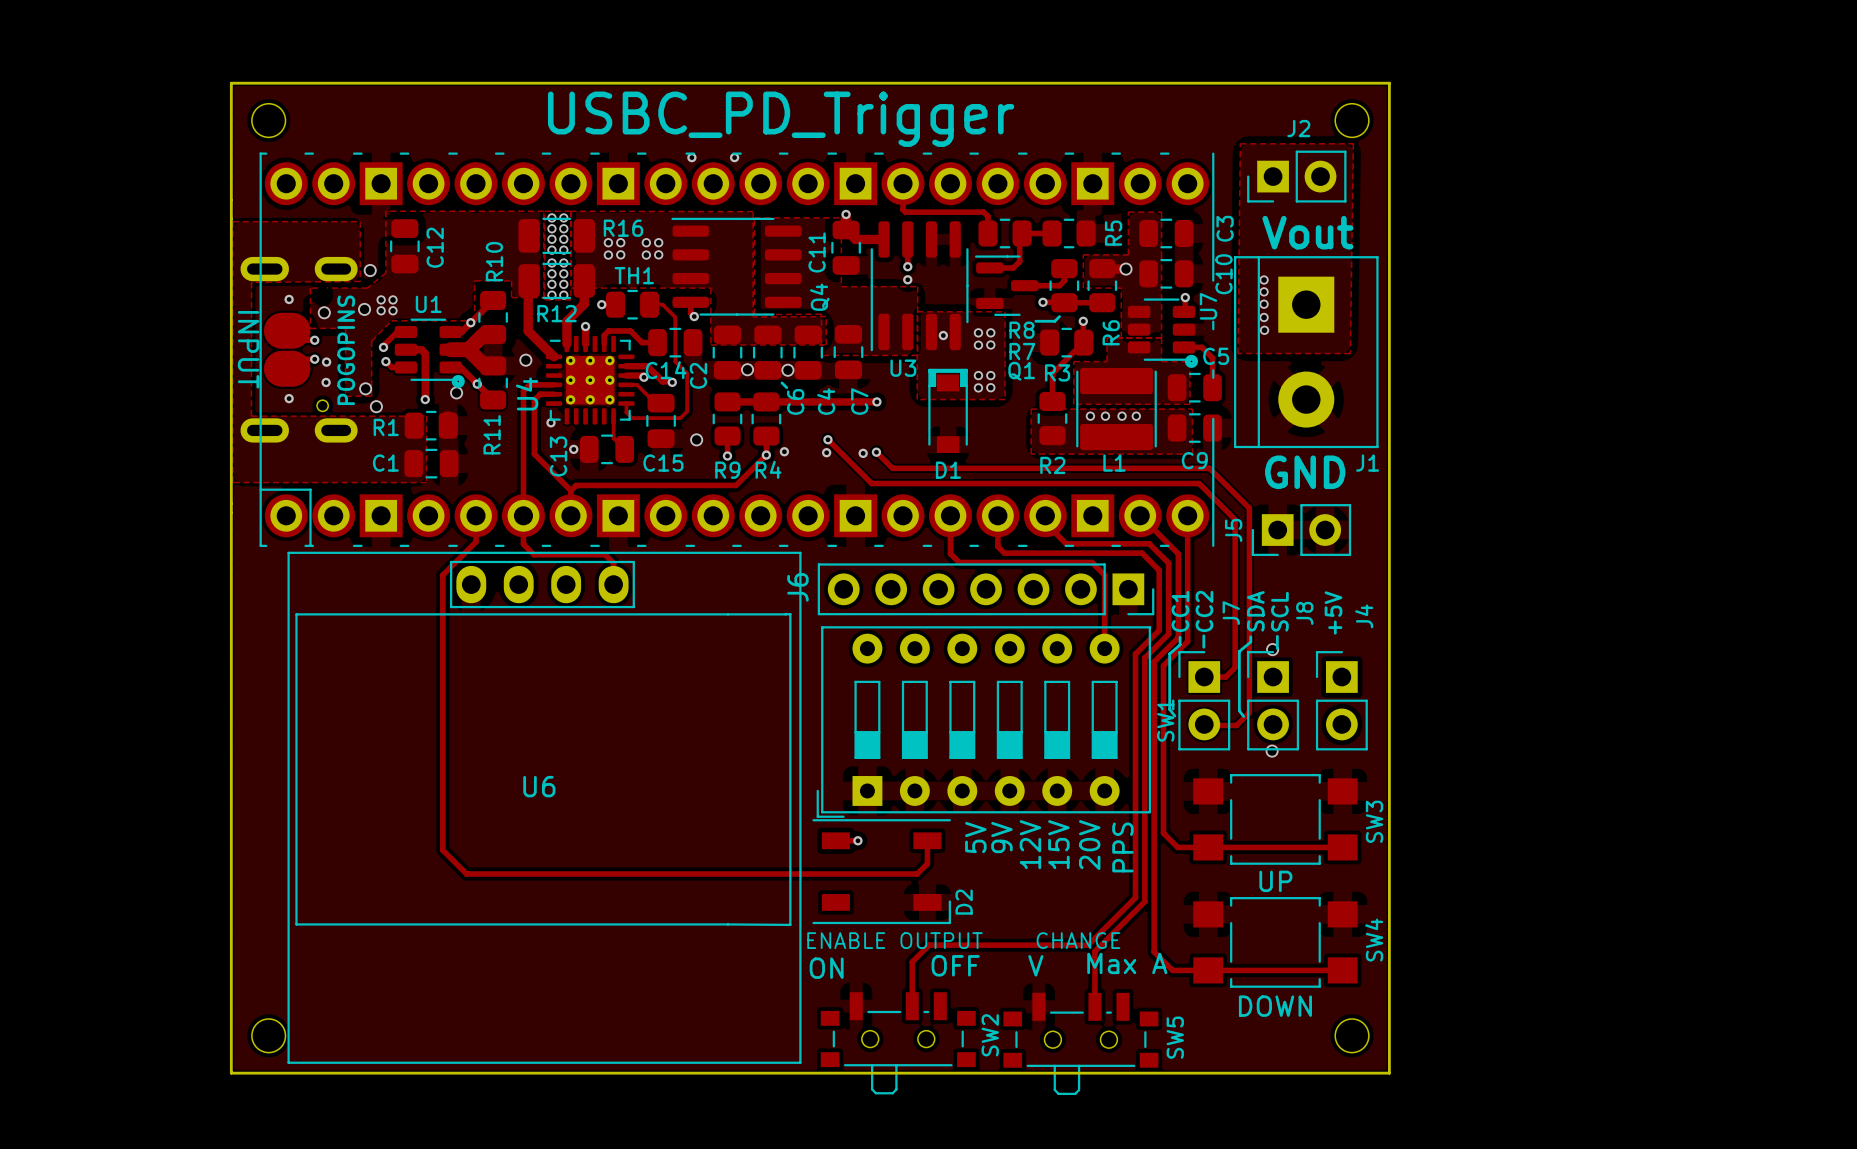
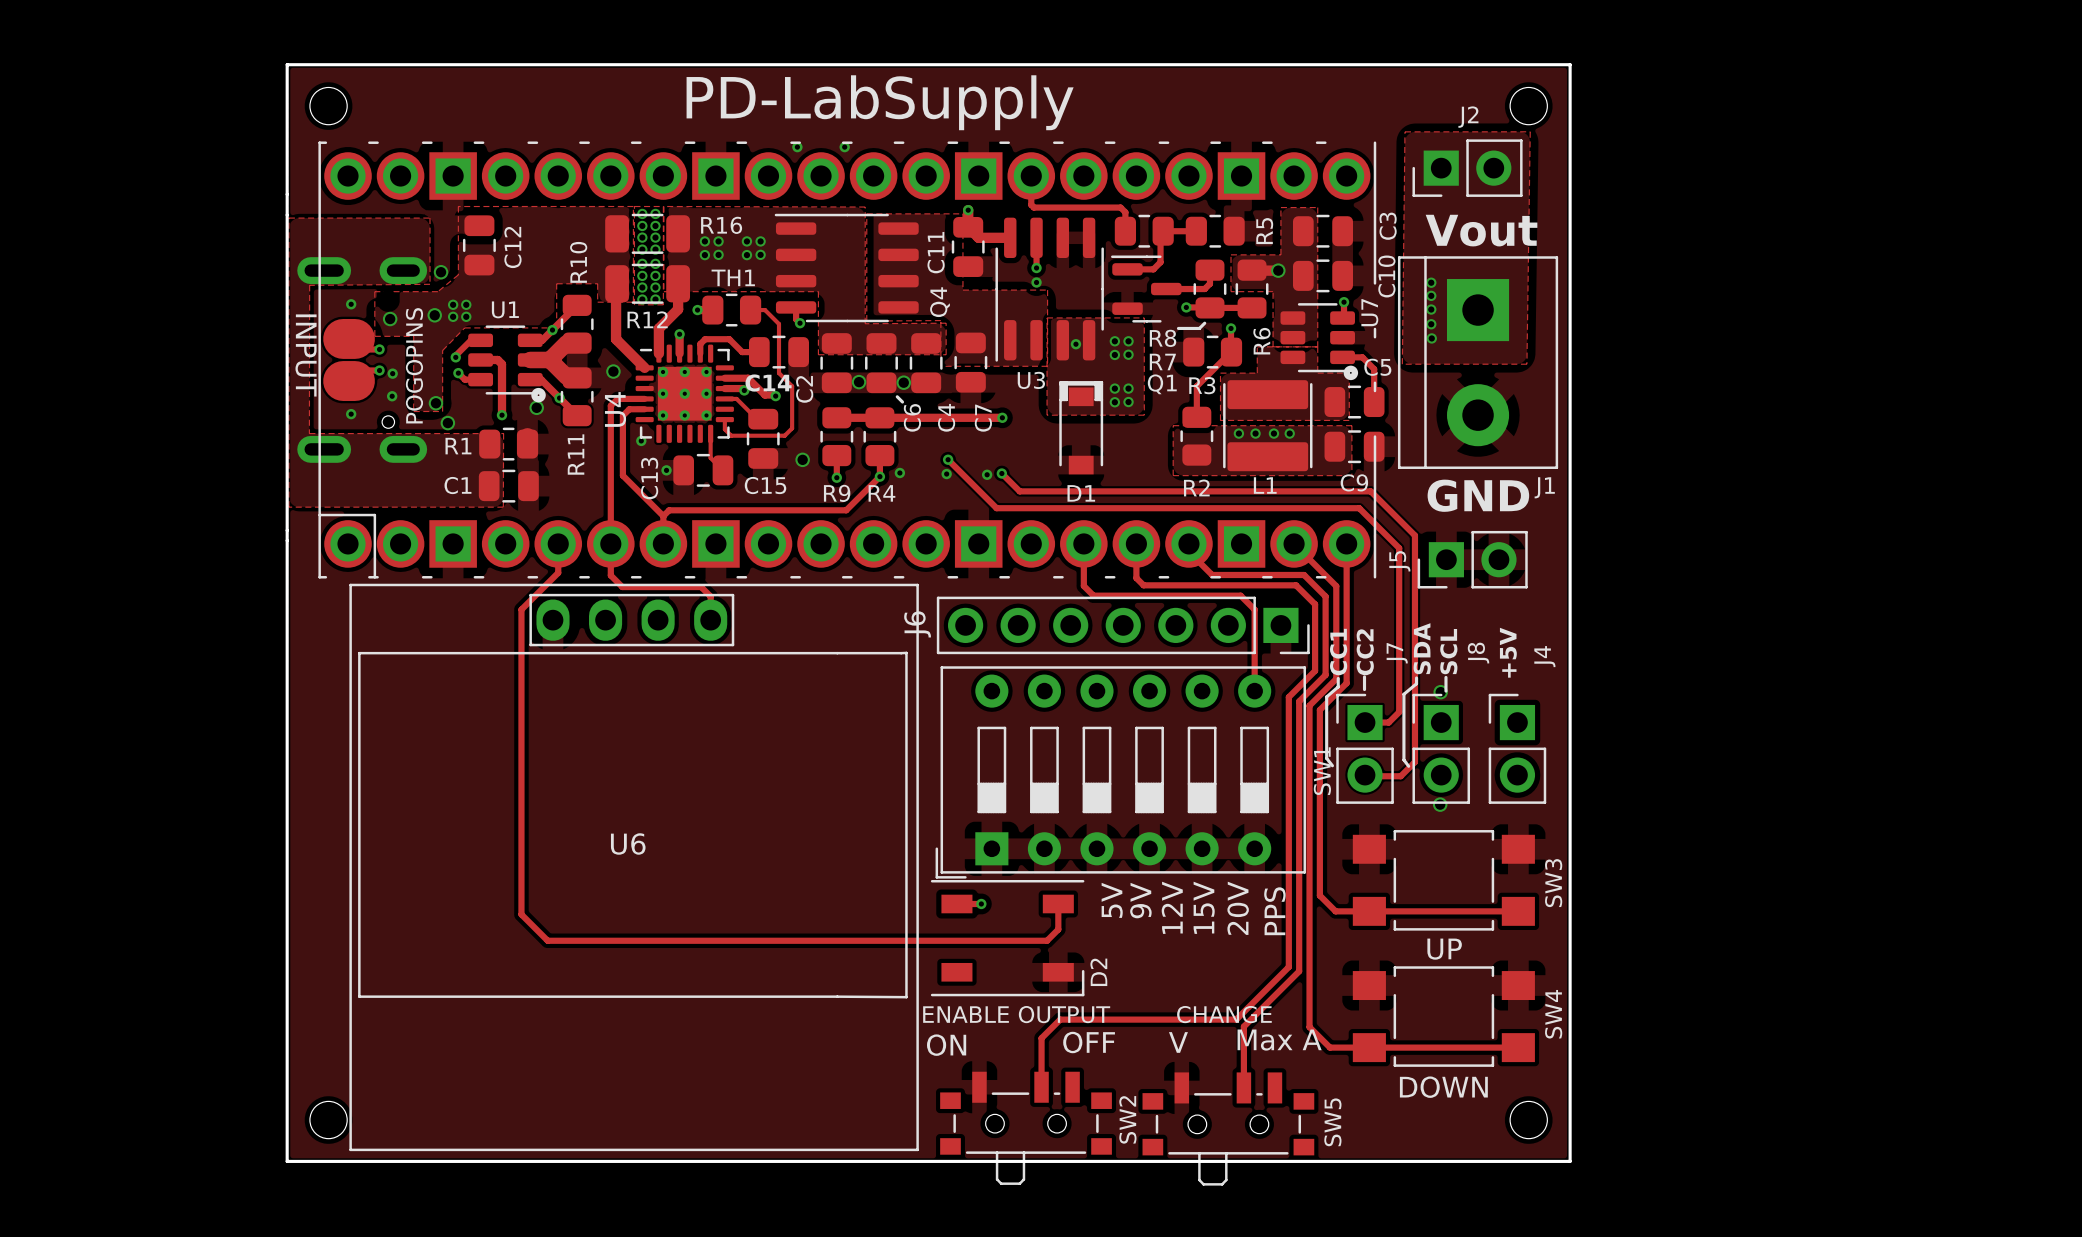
text: USBC_PD_Trigger (781, 119) -> none
text: none -> PD-LabSupply (880, 102)

